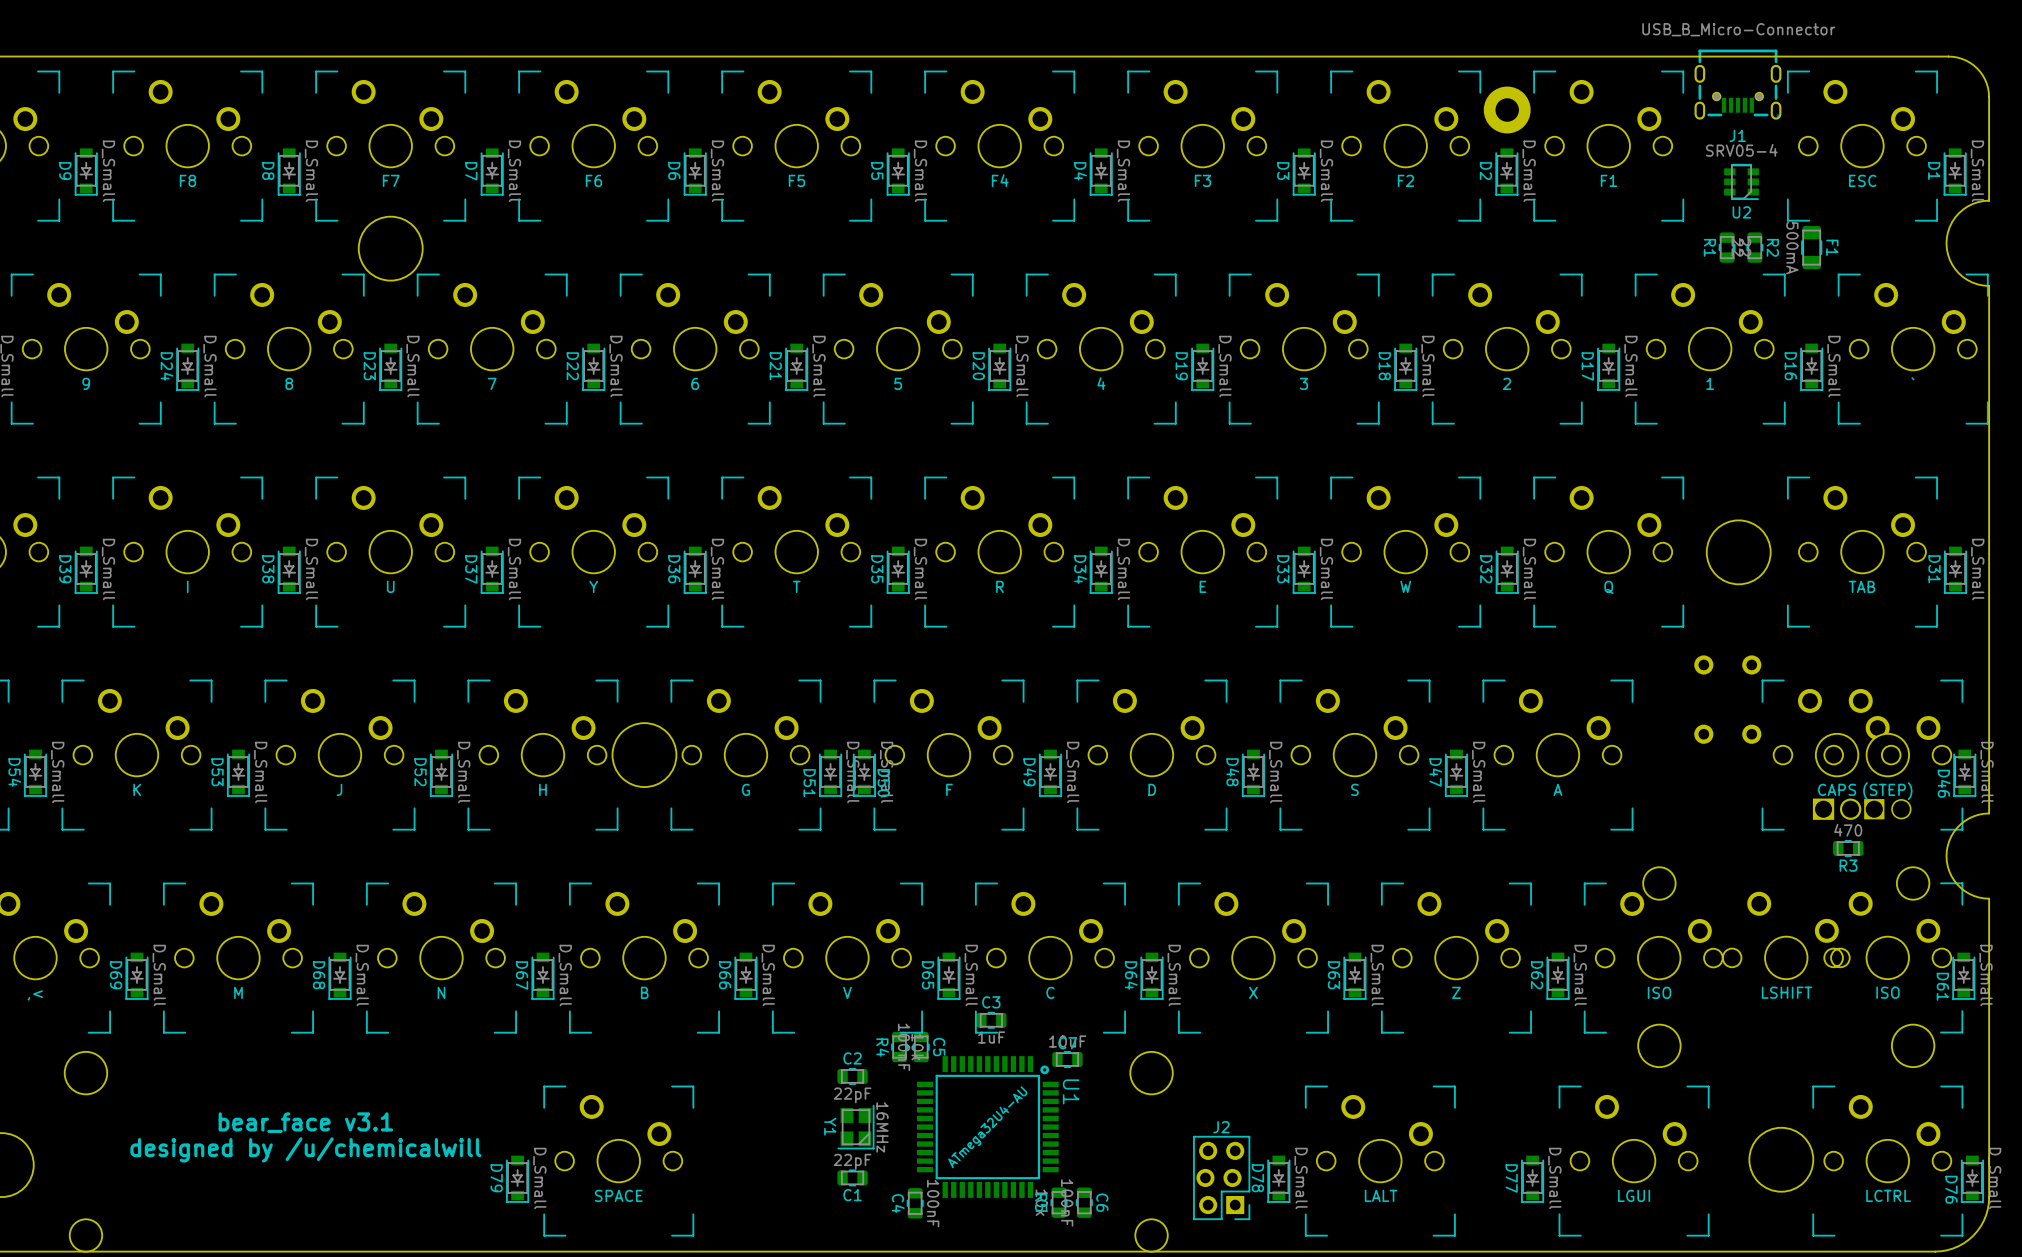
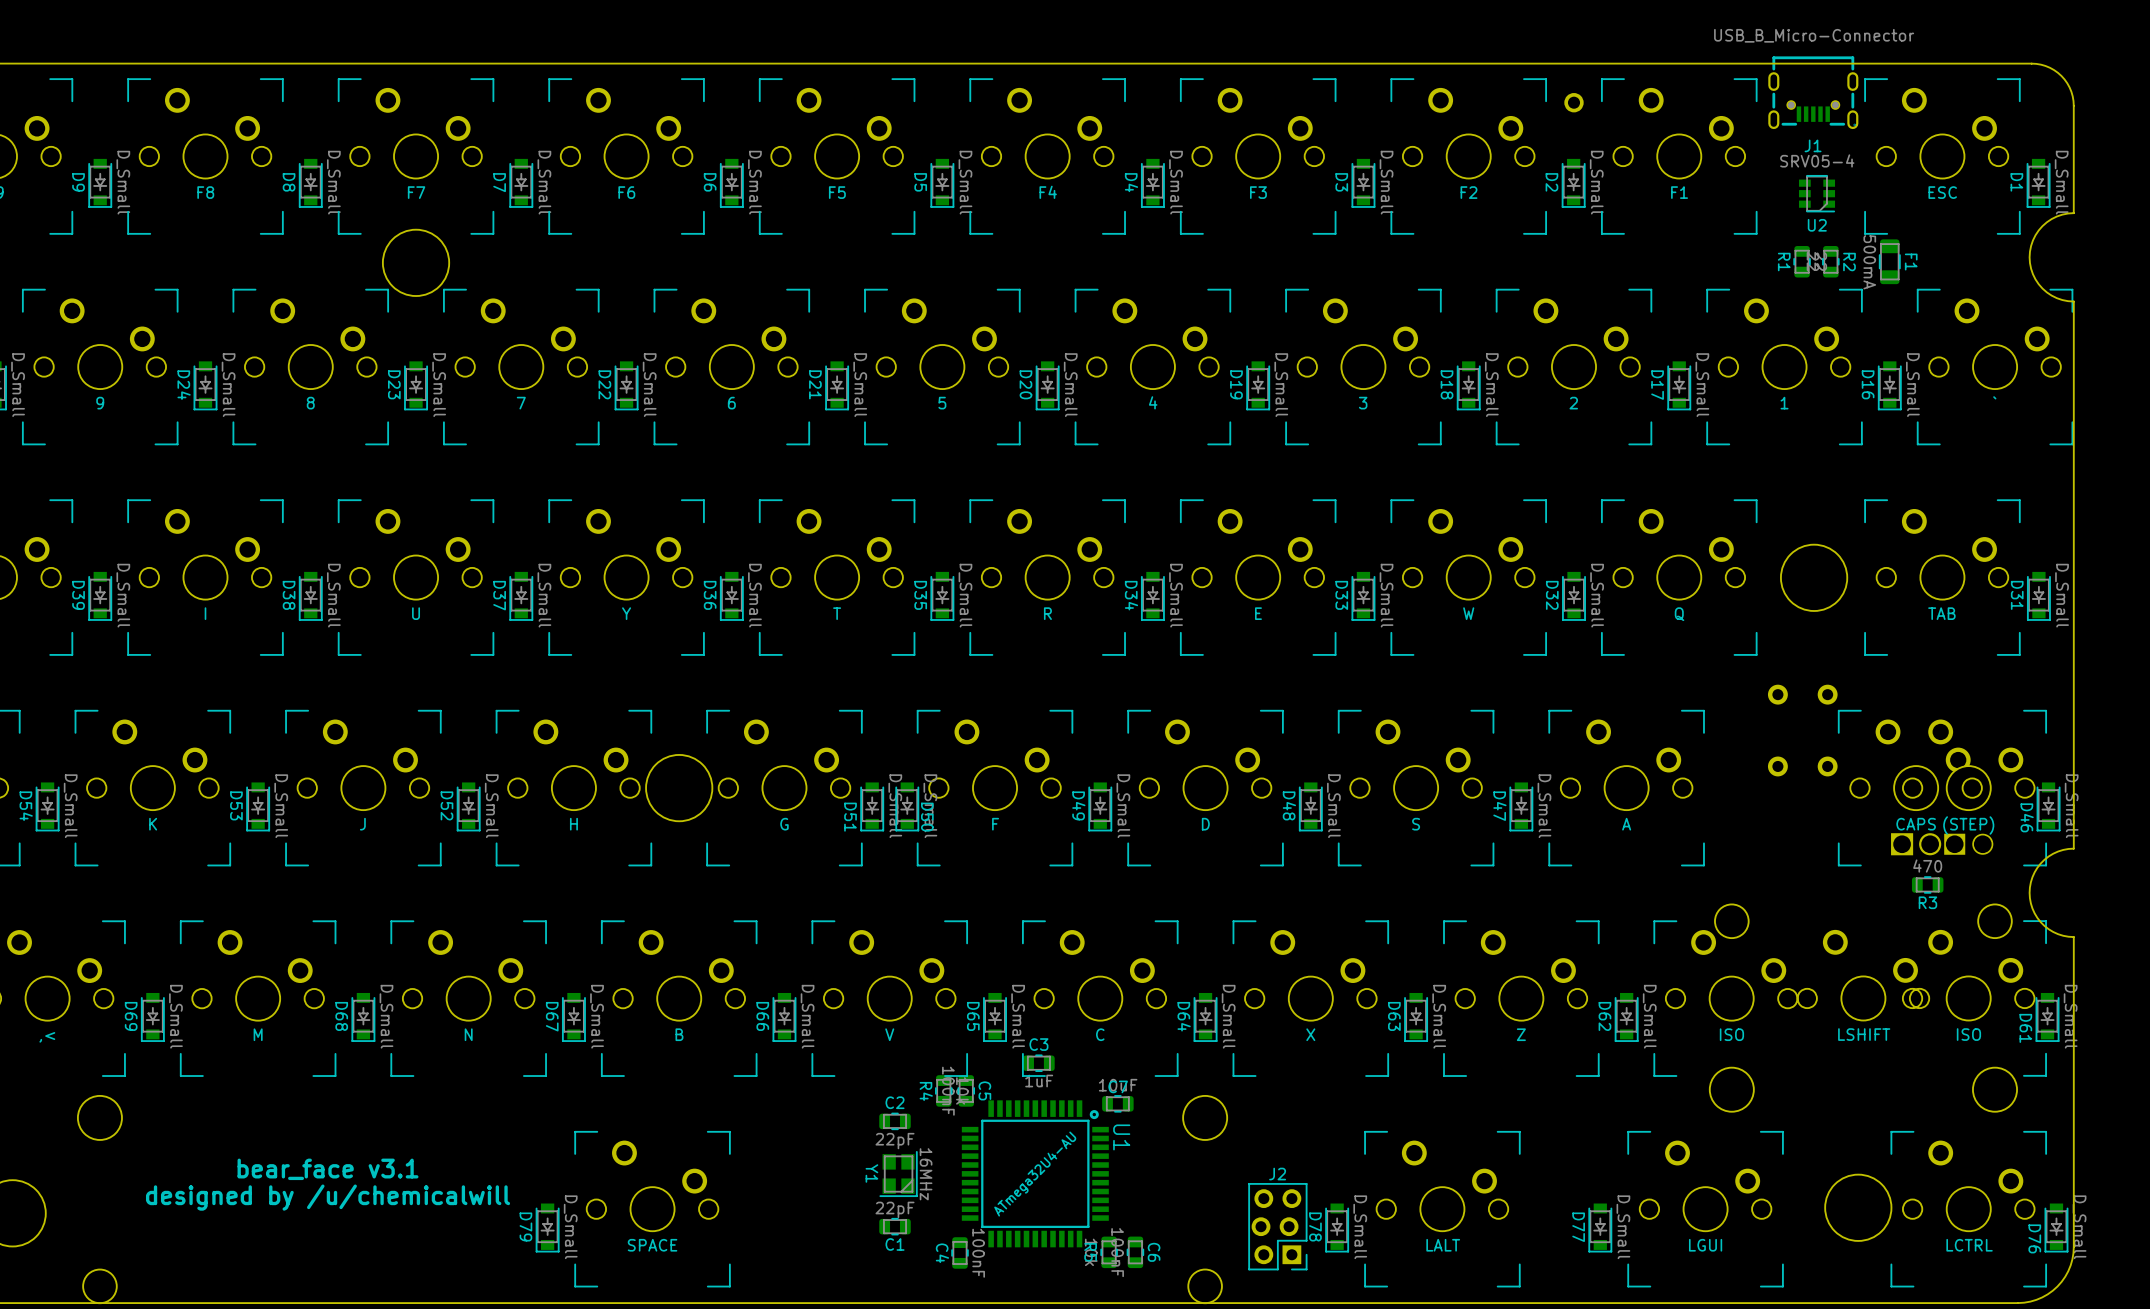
part: none -> (1573, 102)
part: (1507, 110) -> none

